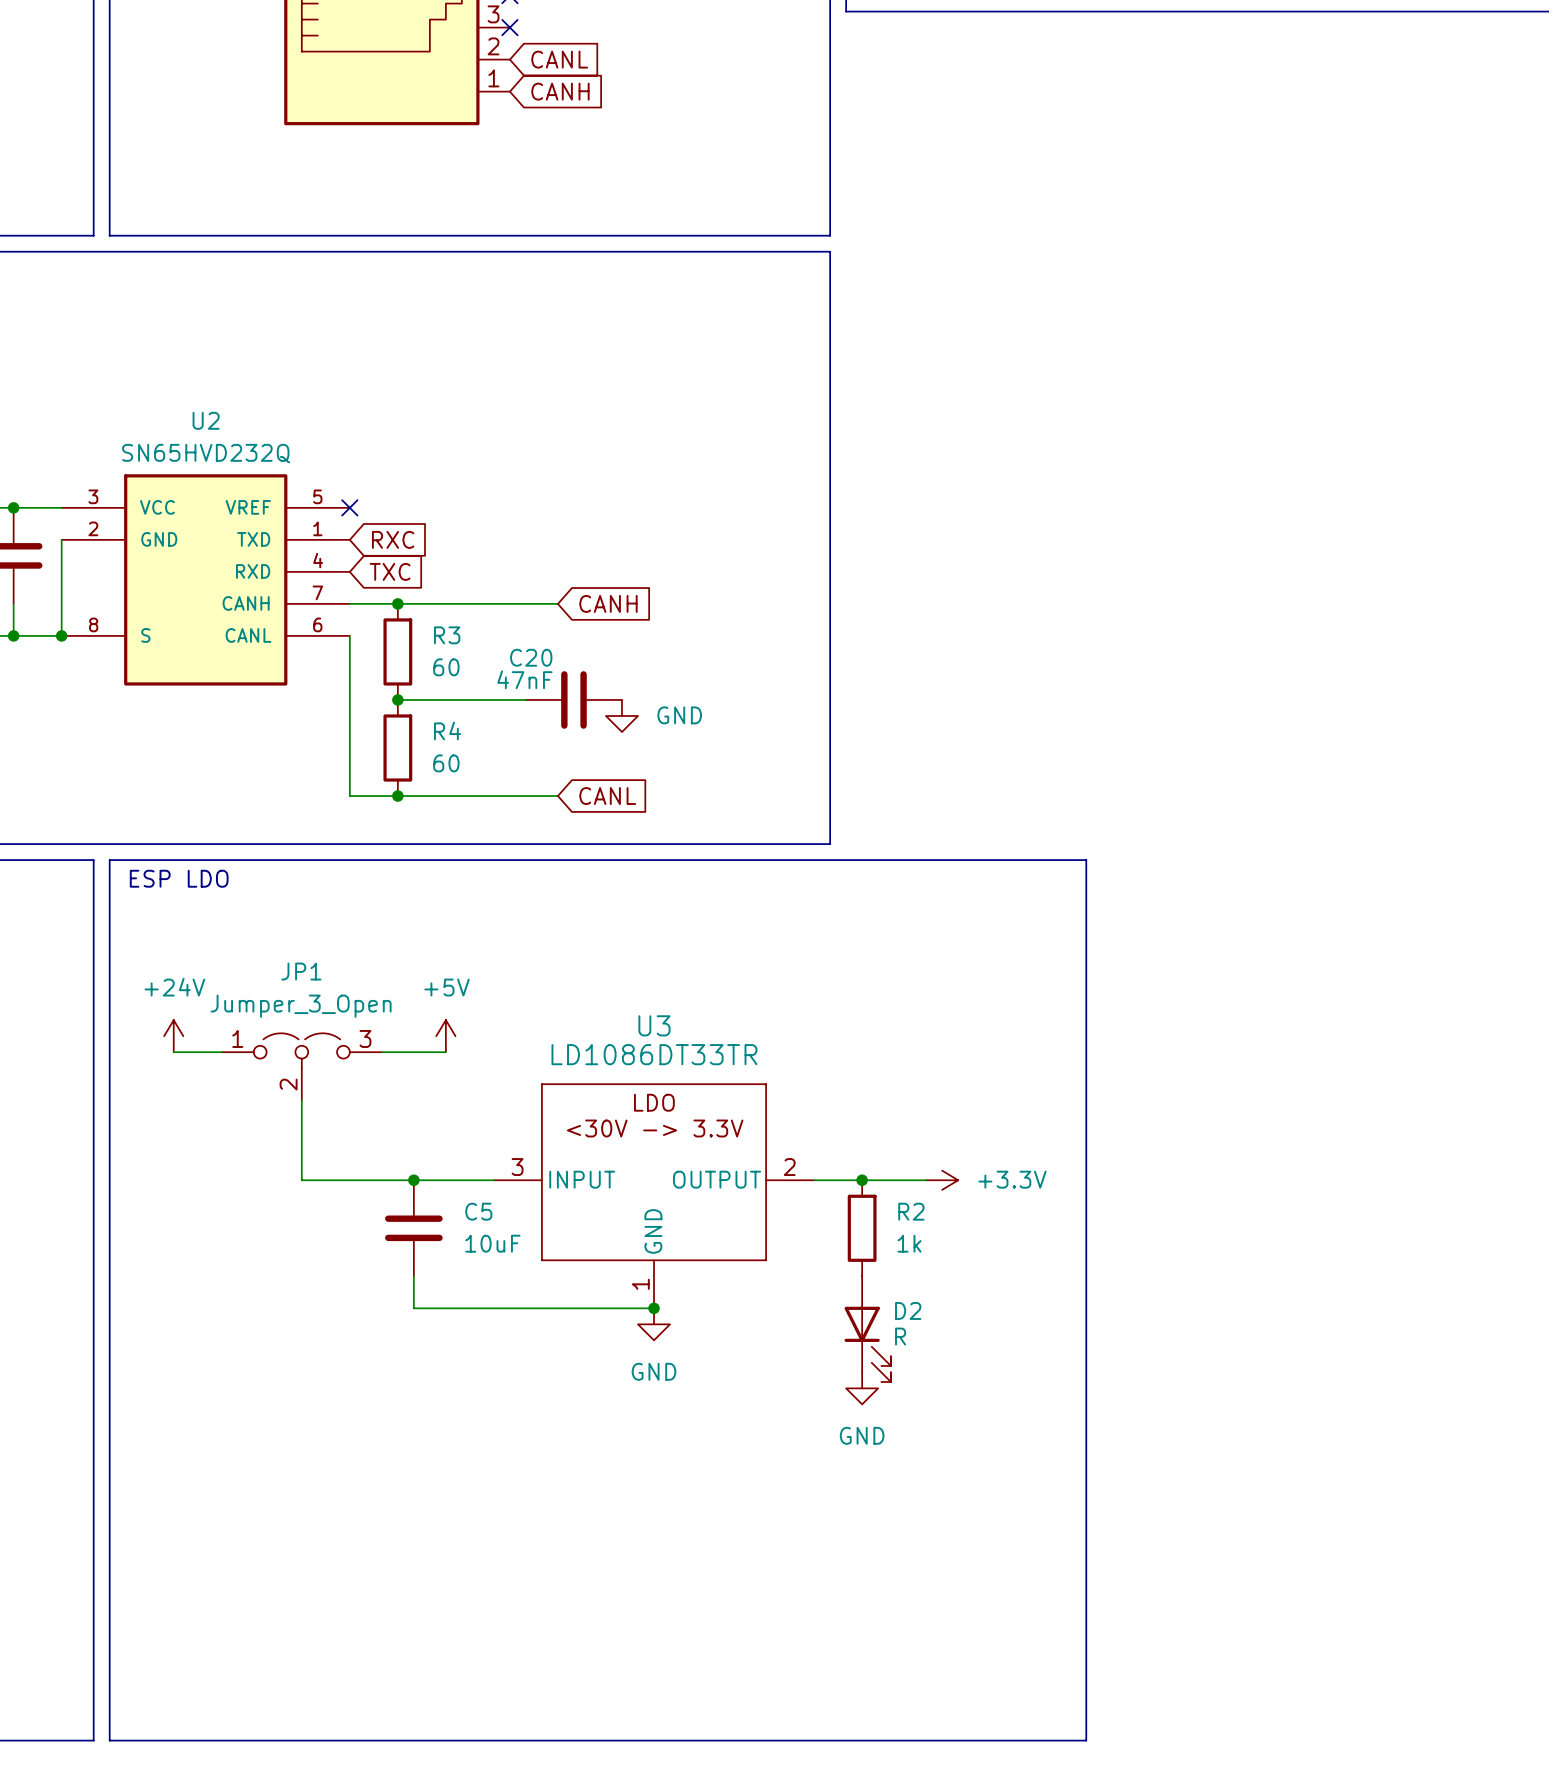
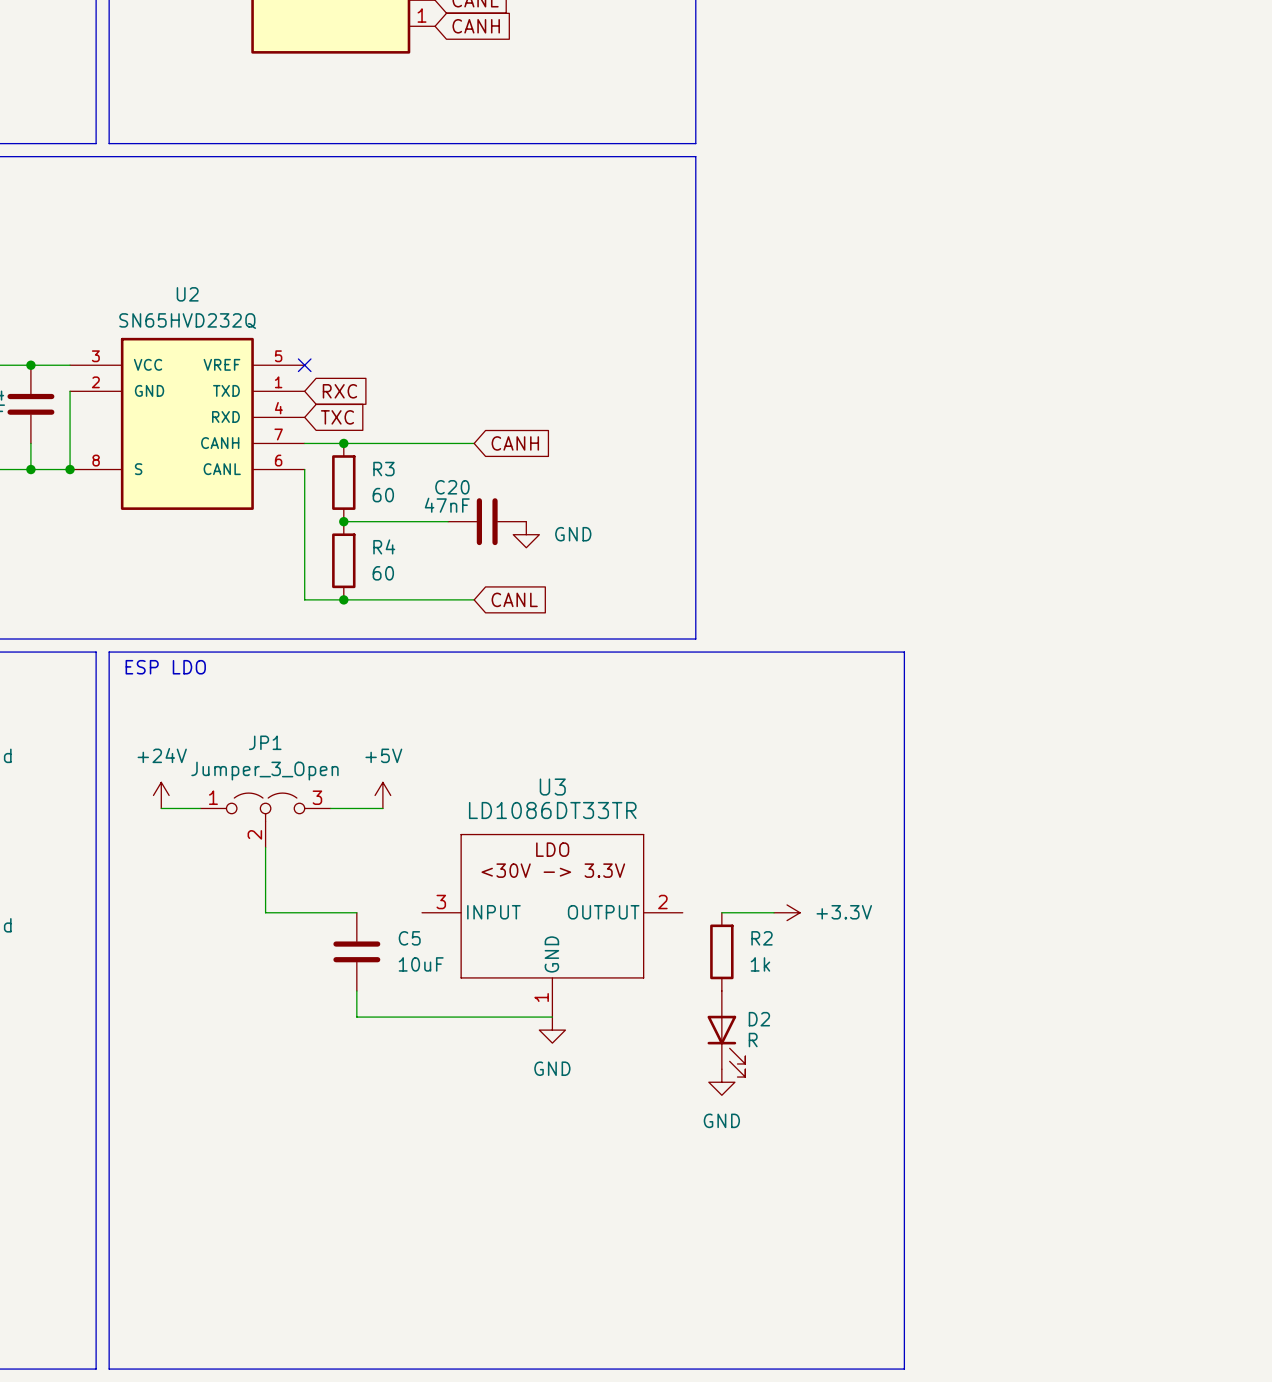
wire: (413, 1180) (493, 1180) -> none
junction: (413, 1180) -> none
wire: (814, 1180) (862, 1180) -> none
junction: (862, 1180) -> none
junction: (654, 1308) -> none

